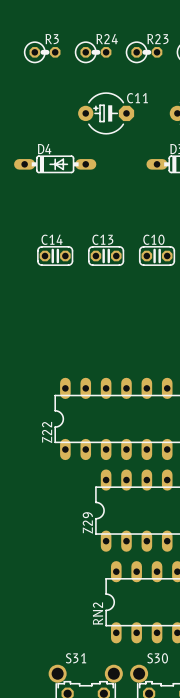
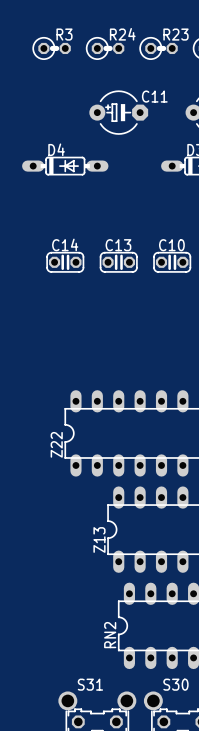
Z29 name: Z29 (87, 522) -> Z13 (99, 540)

